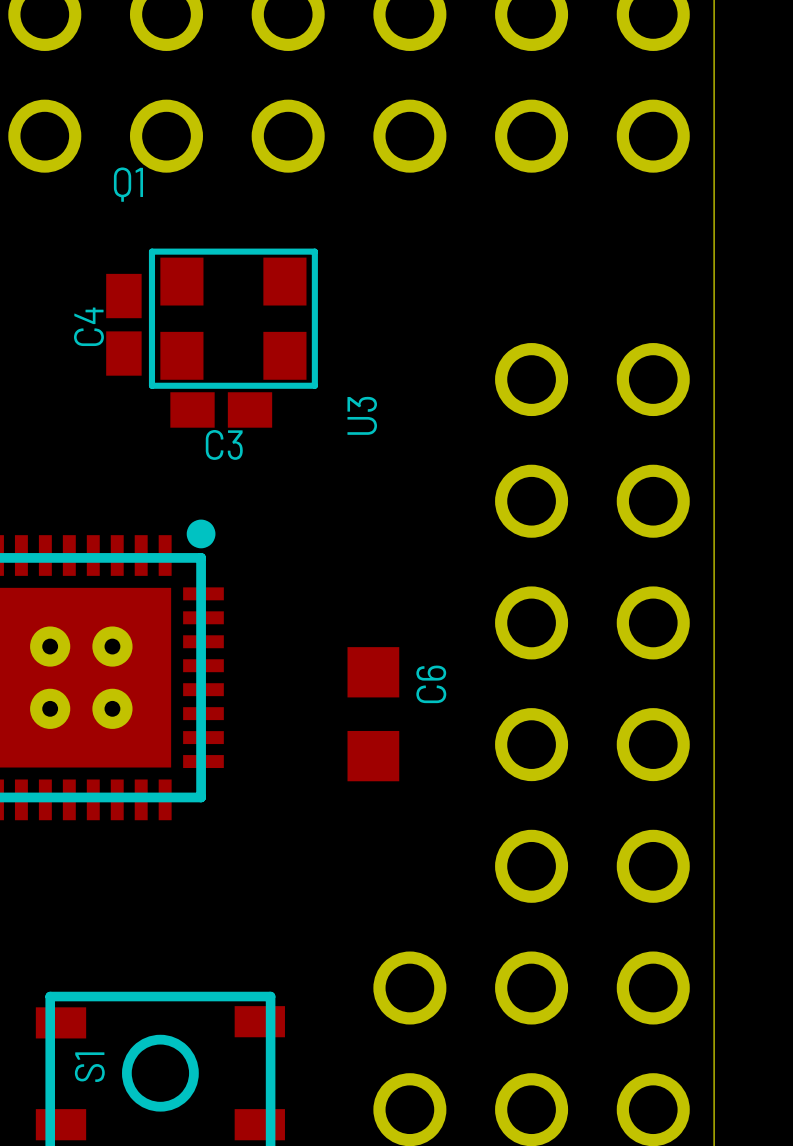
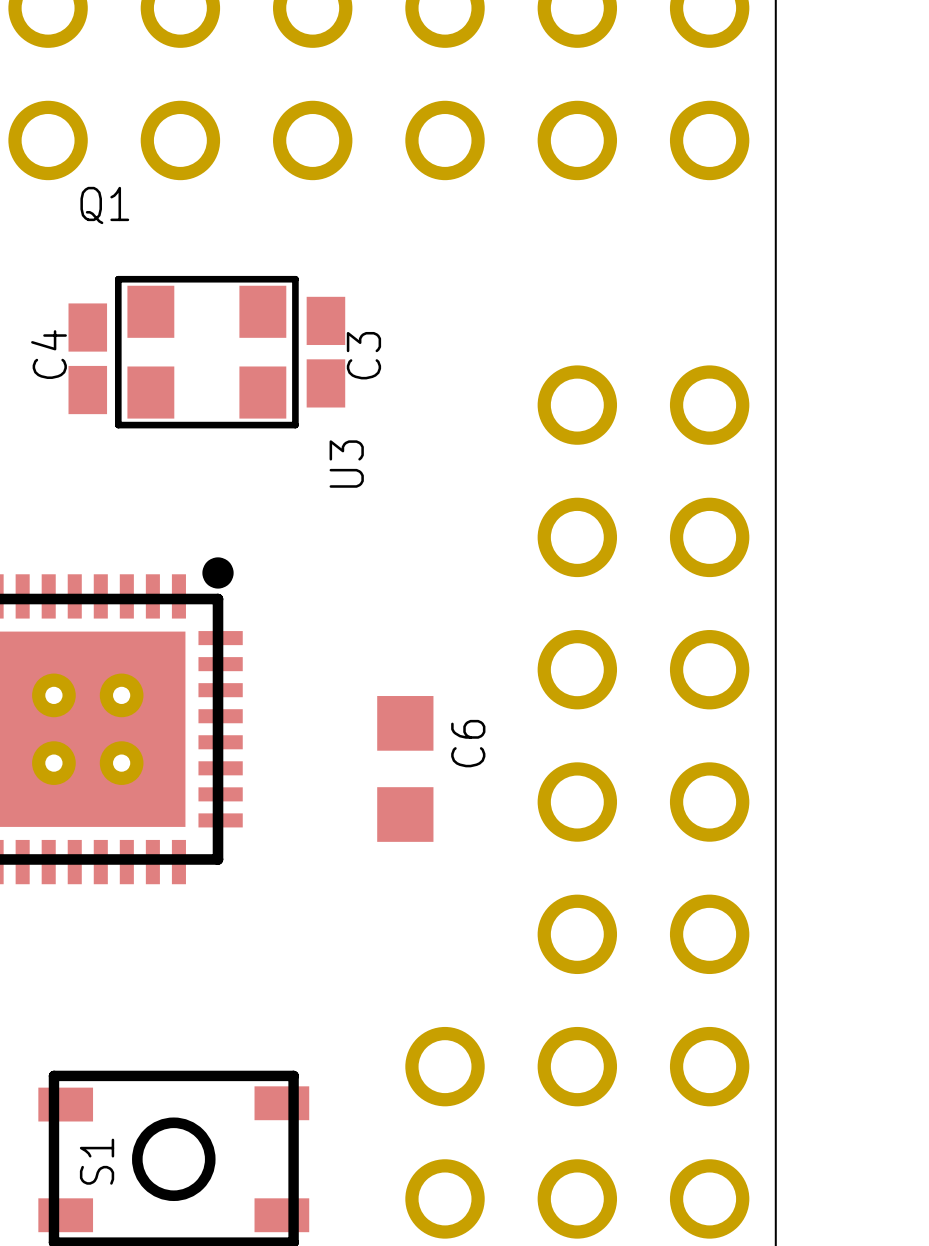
Q1 position: (233, 318) -> (206, 352)
C4 position: (123, 324) -> (87, 358)
C3 rotation: 0° (221, 409) -> 90° clockwise (325, 352)
C3 position: (221, 409) -> (325, 352)
U3 name position: U3 (362, 415) -> U3 (346, 464)

